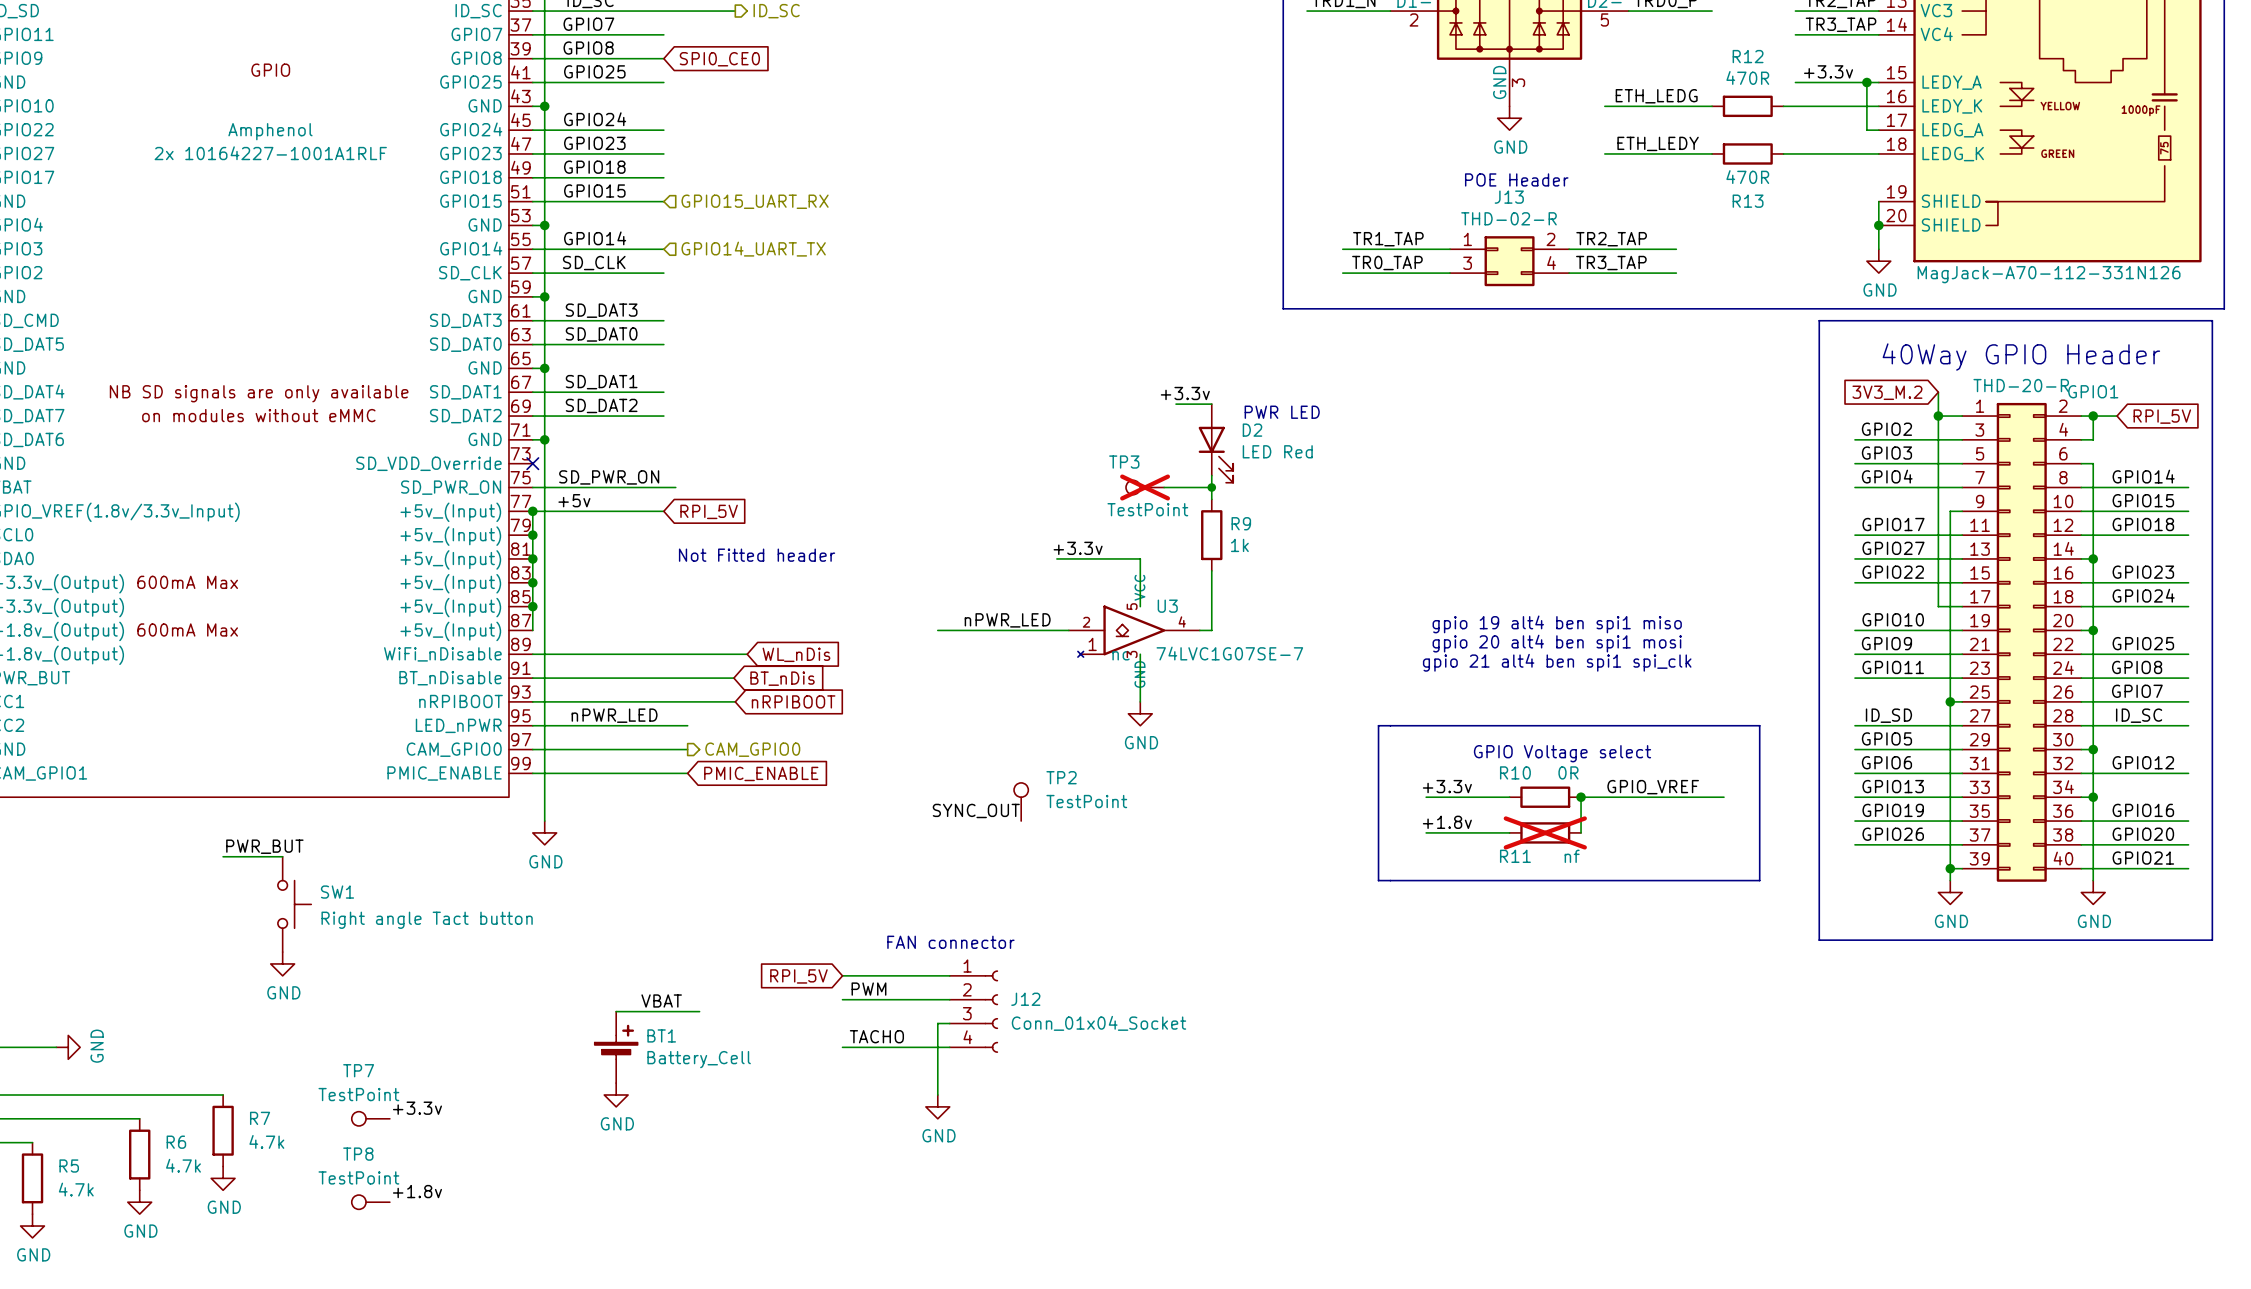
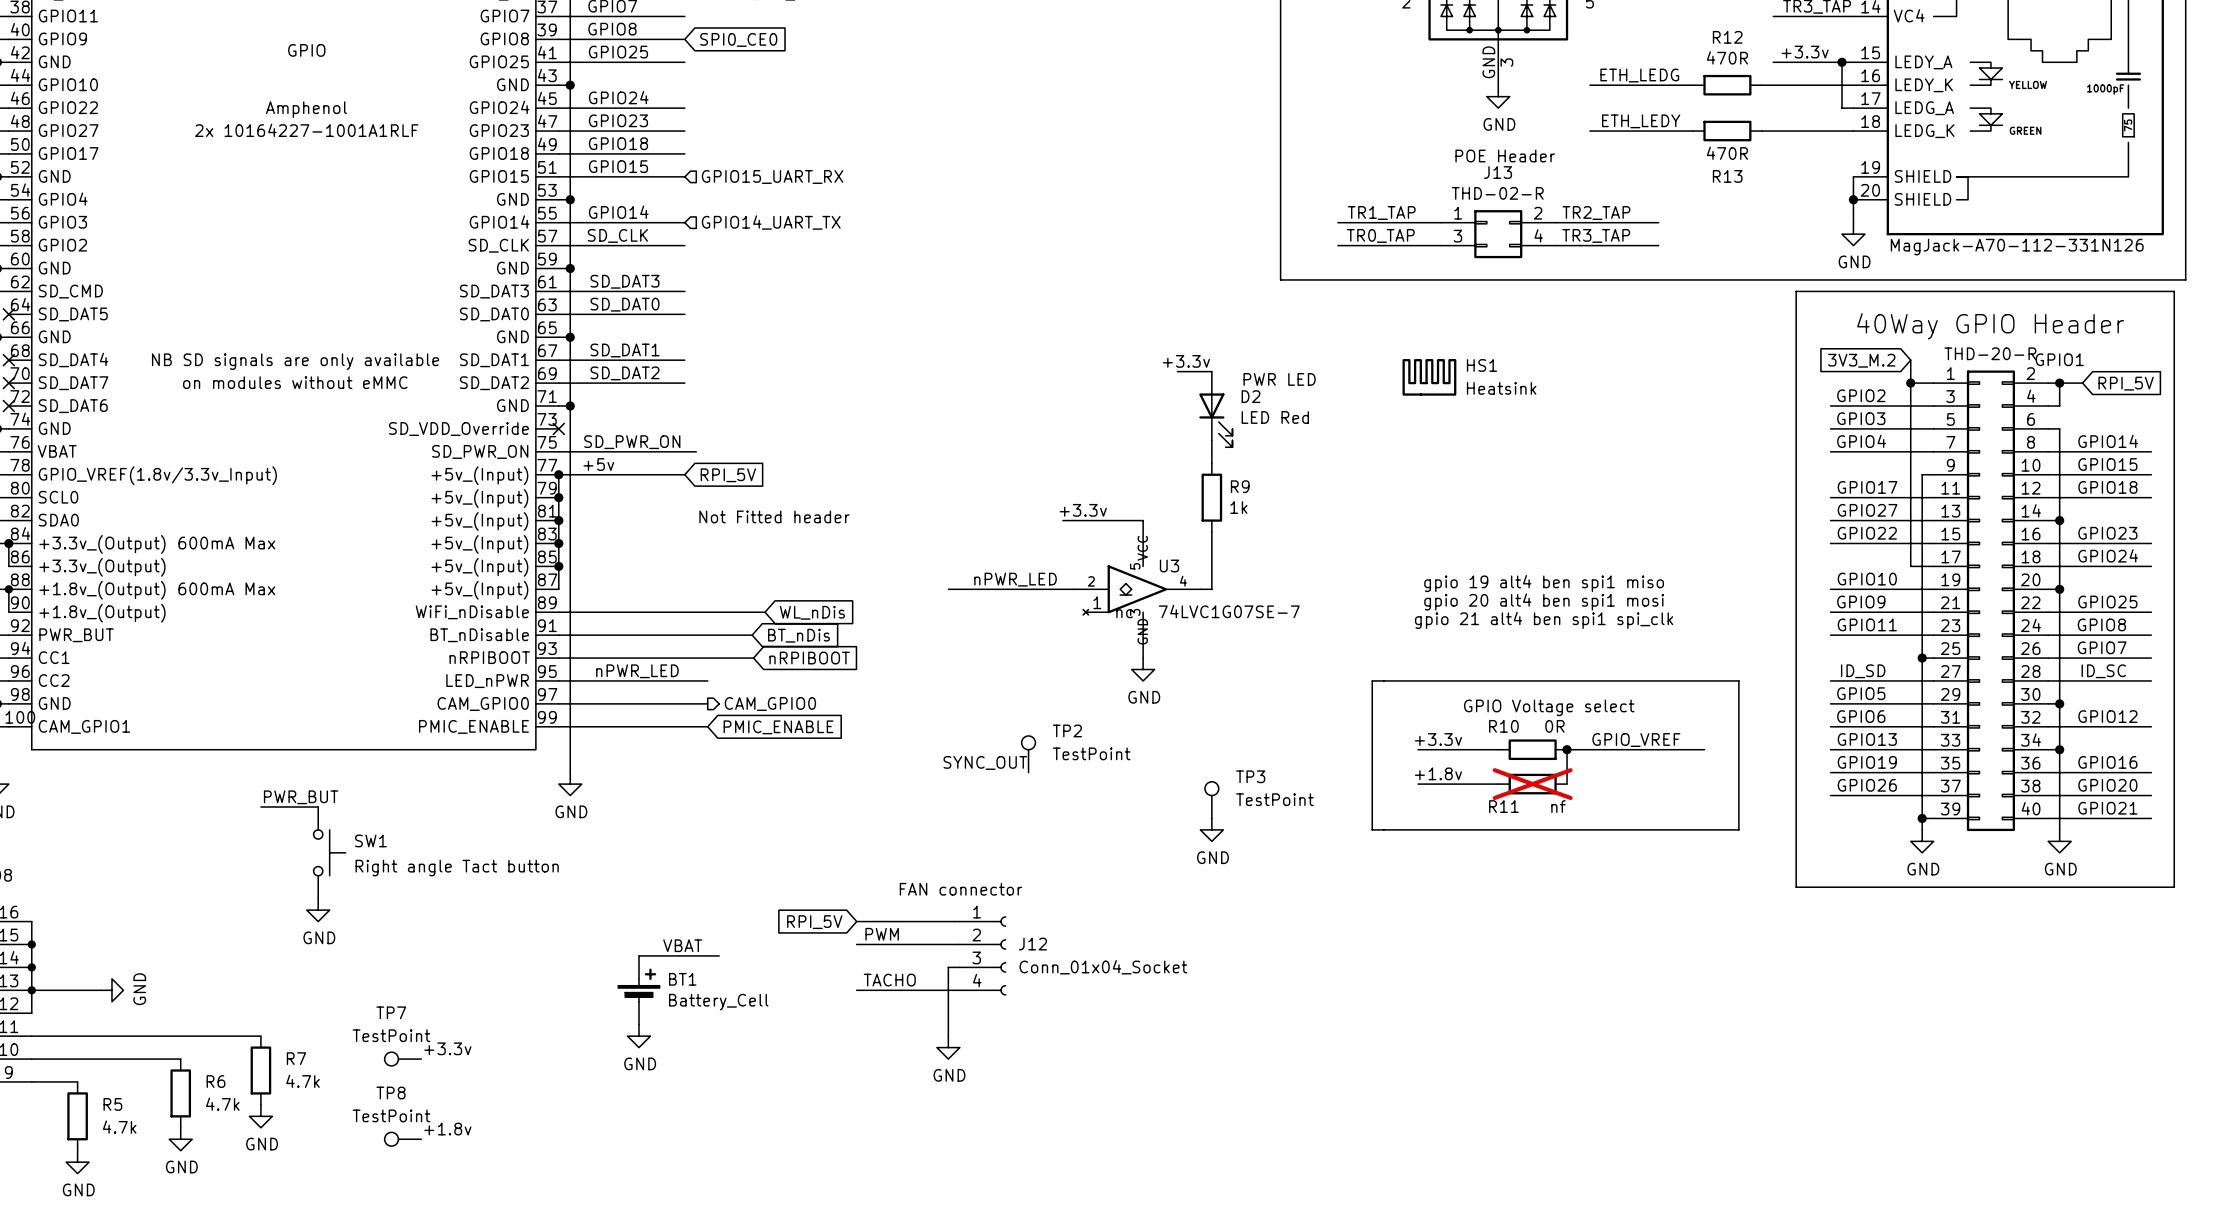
HS1: none -> Heatsink (1429, 377)
TP3 rotation: 0° (1133, 487) -> 90° clockwise (1211, 788)
TP3 position: (1145, 487) -> (1211, 800)
TP3 do-not-place cross: (1145, 487) -> none
wire: (1164, 487) (1211, 487) -> none
junction: (1211, 487) -> none
TP3 value position: TestPoint (1147, 509) -> TestPoint (1274, 799)
power symbol: none -> GND (1211, 829)

